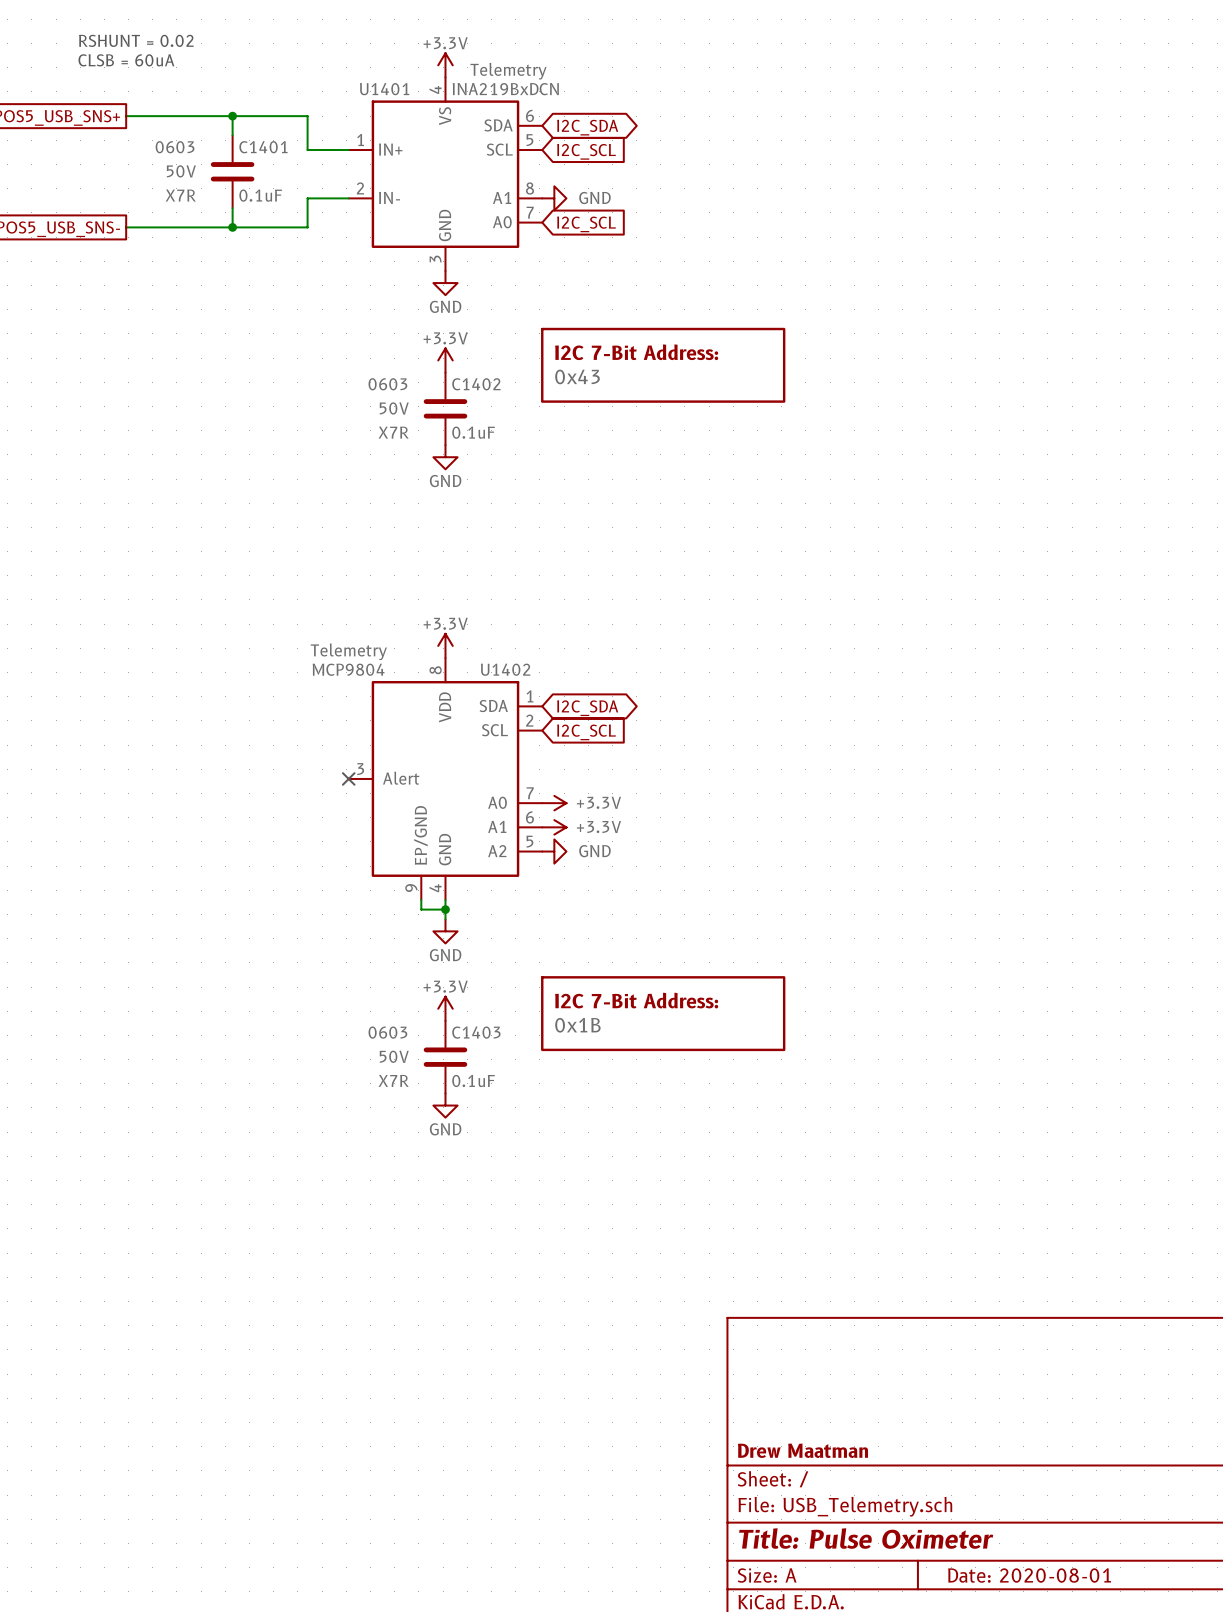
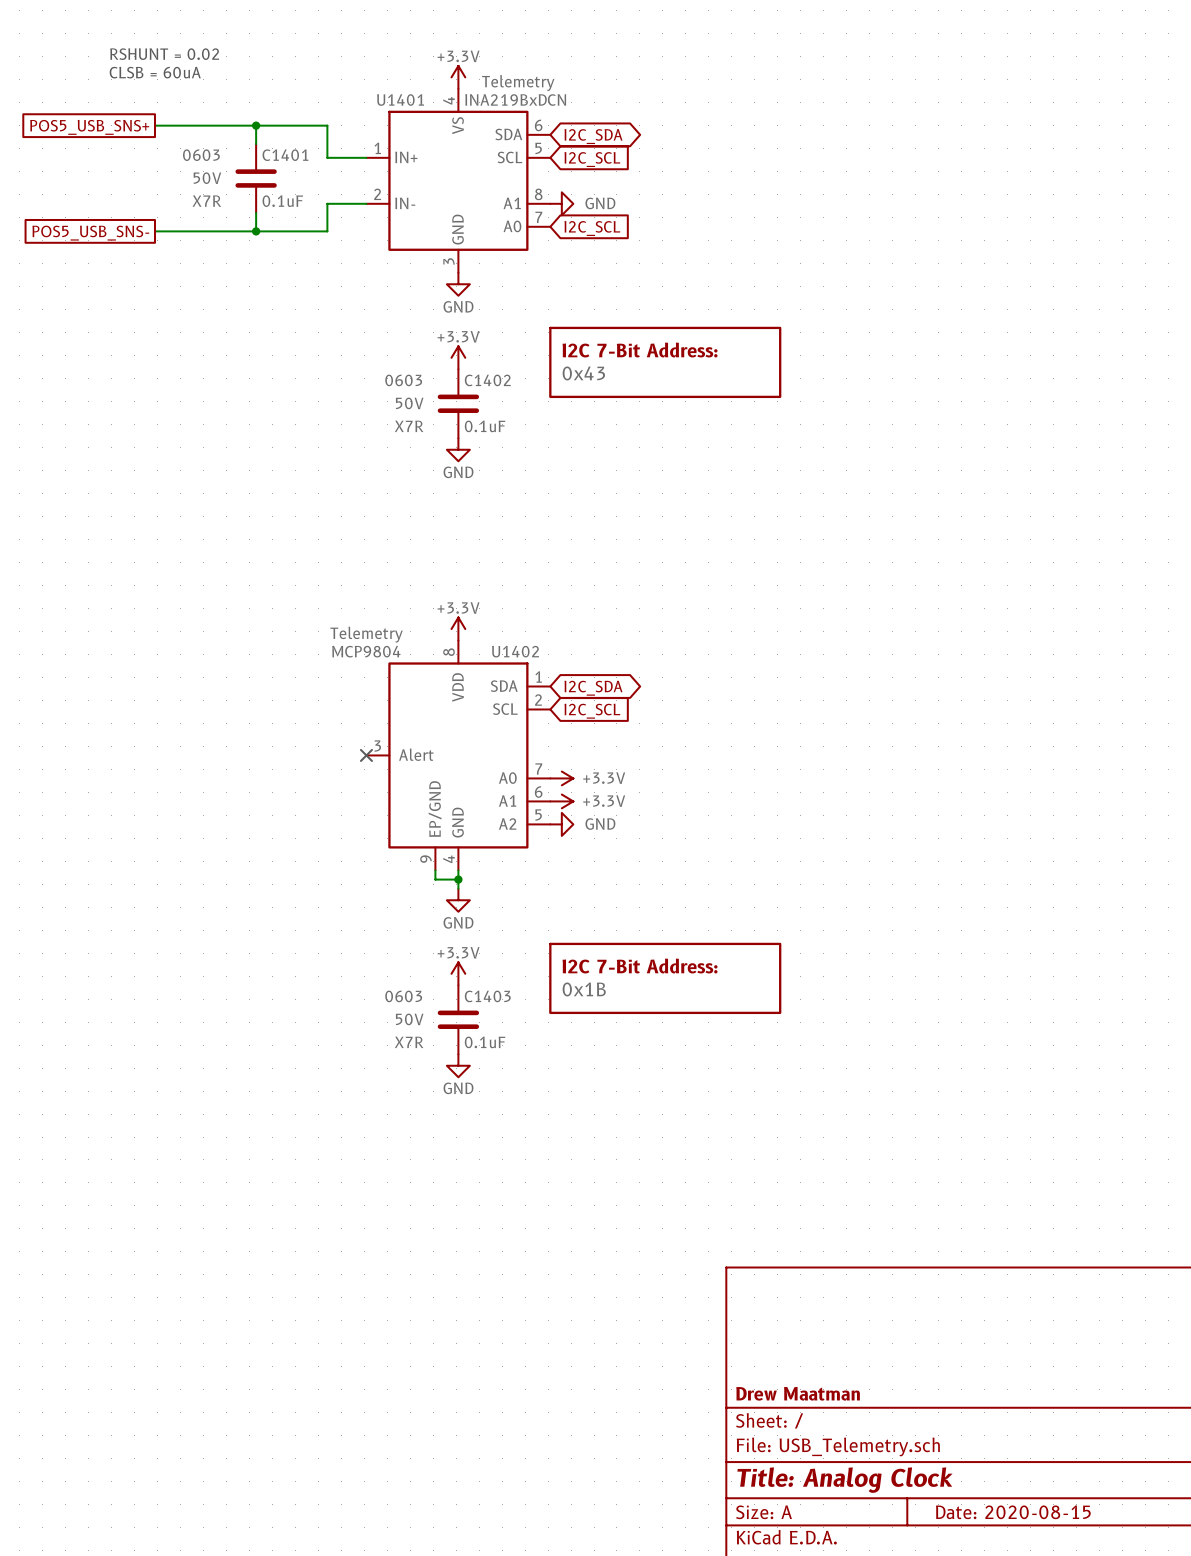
title block: Title: Pulse Oximeter (866, 1538) -> Title: Analog Clock (845, 1480)
title block: Date: 2020-08-01 (1029, 1575) -> Date: 2020-08-15 (1013, 1512)

